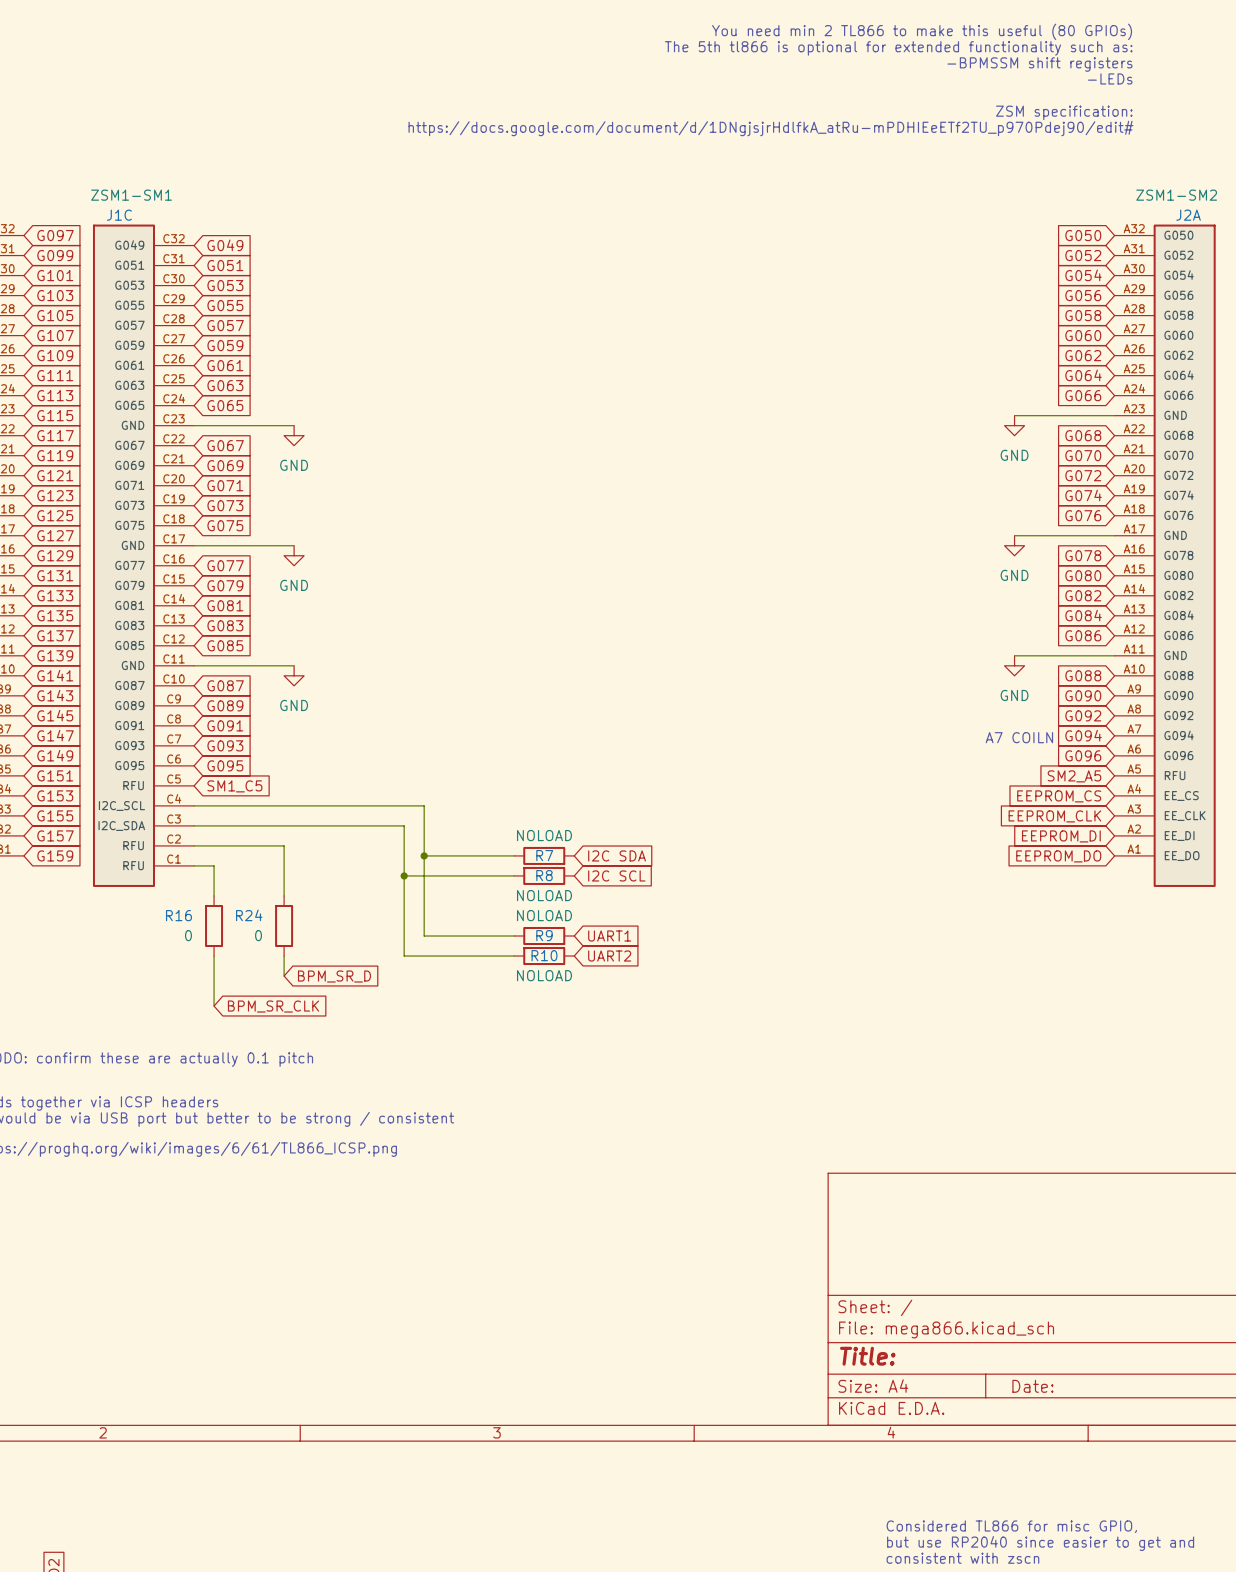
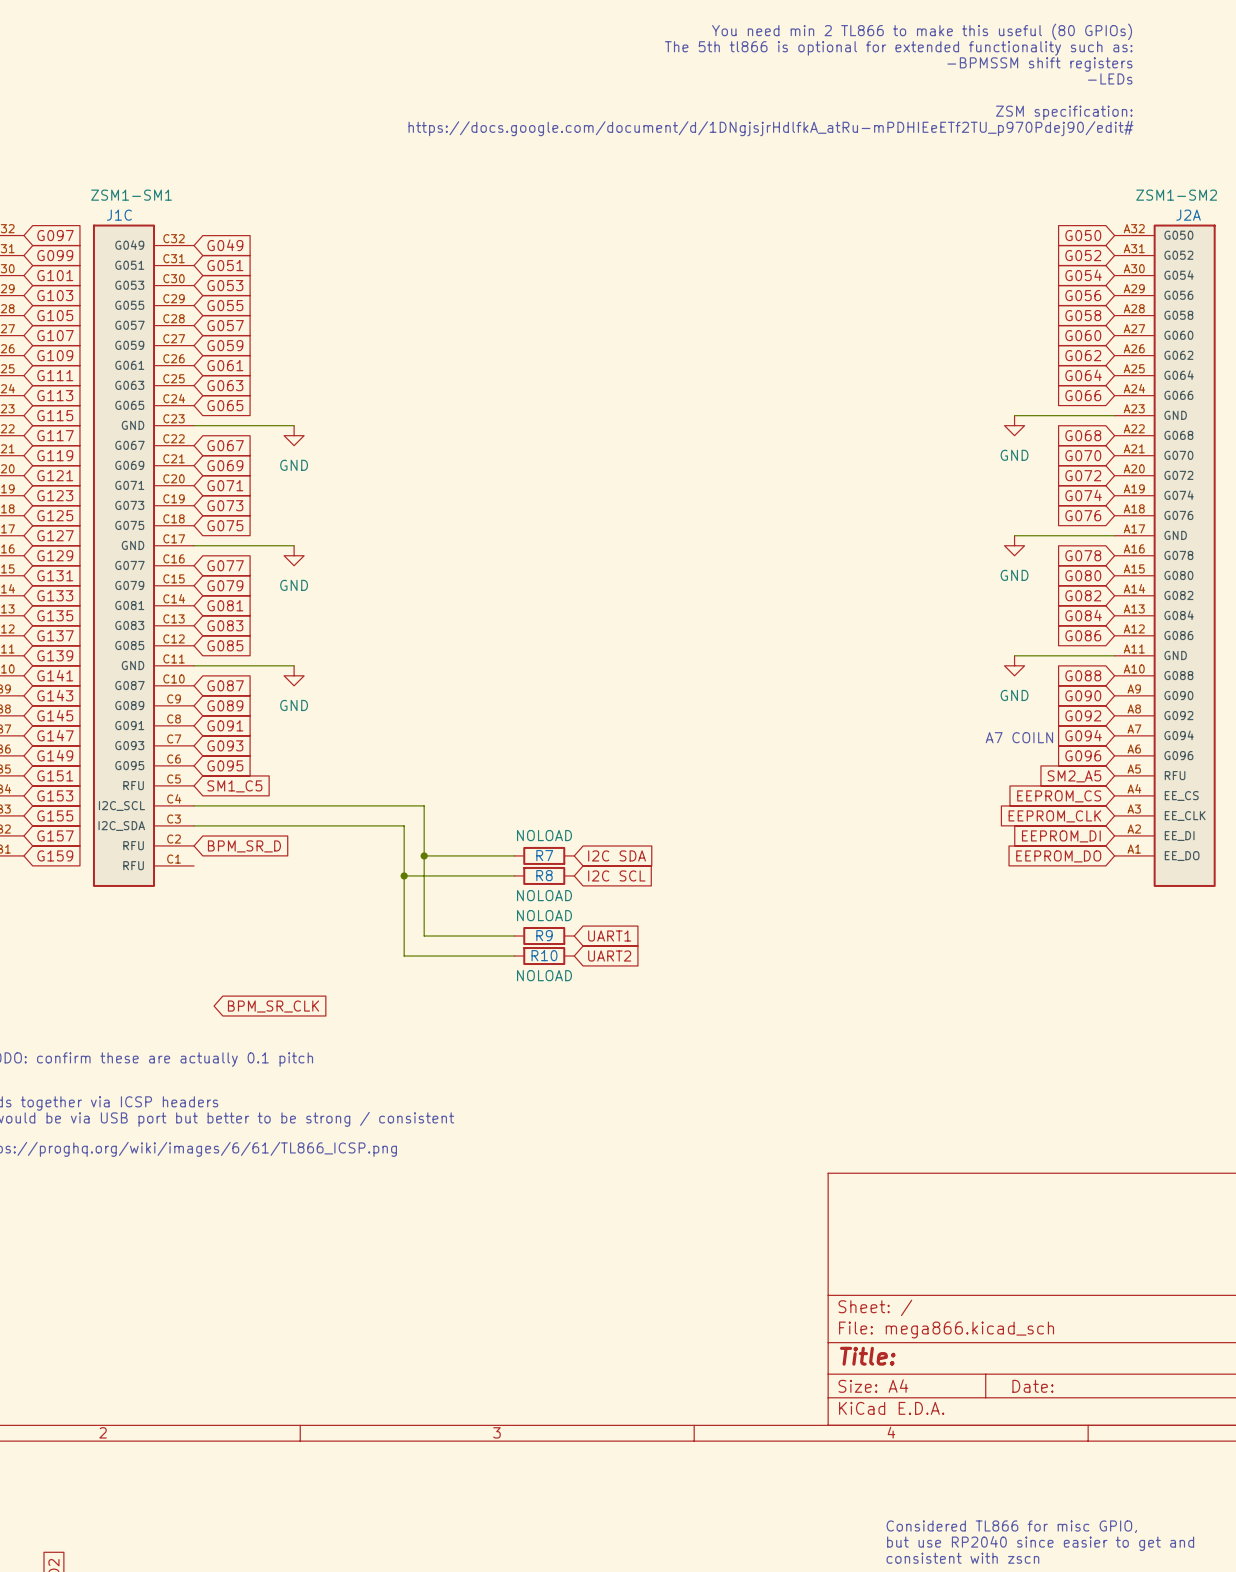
wire: (194, 845) (284, 845) (284, 895) -> none
wire: (194, 865) (214, 865) (214, 895) -> none
R16: 0 (214, 925) -> none
R24: 0 (284, 925) -> none
wire: (214, 956) (214, 1006) -> none
wire: (284, 956) (284, 976) -> none
global label position: BPM_SR_D (334, 976) -> BPM_SR_D (244, 846)

